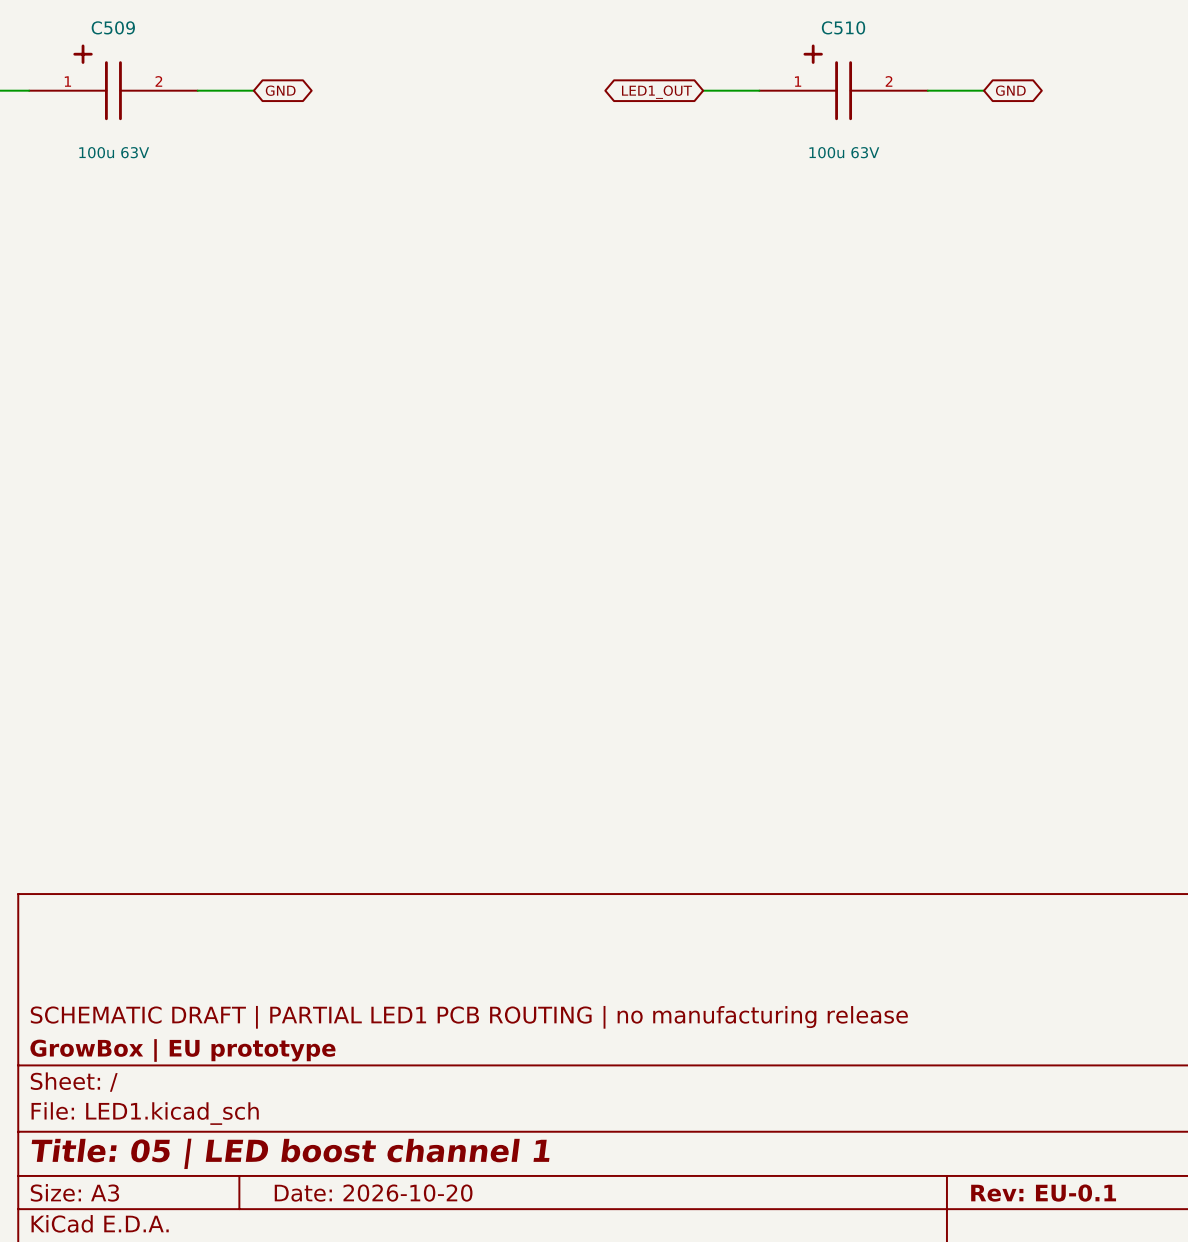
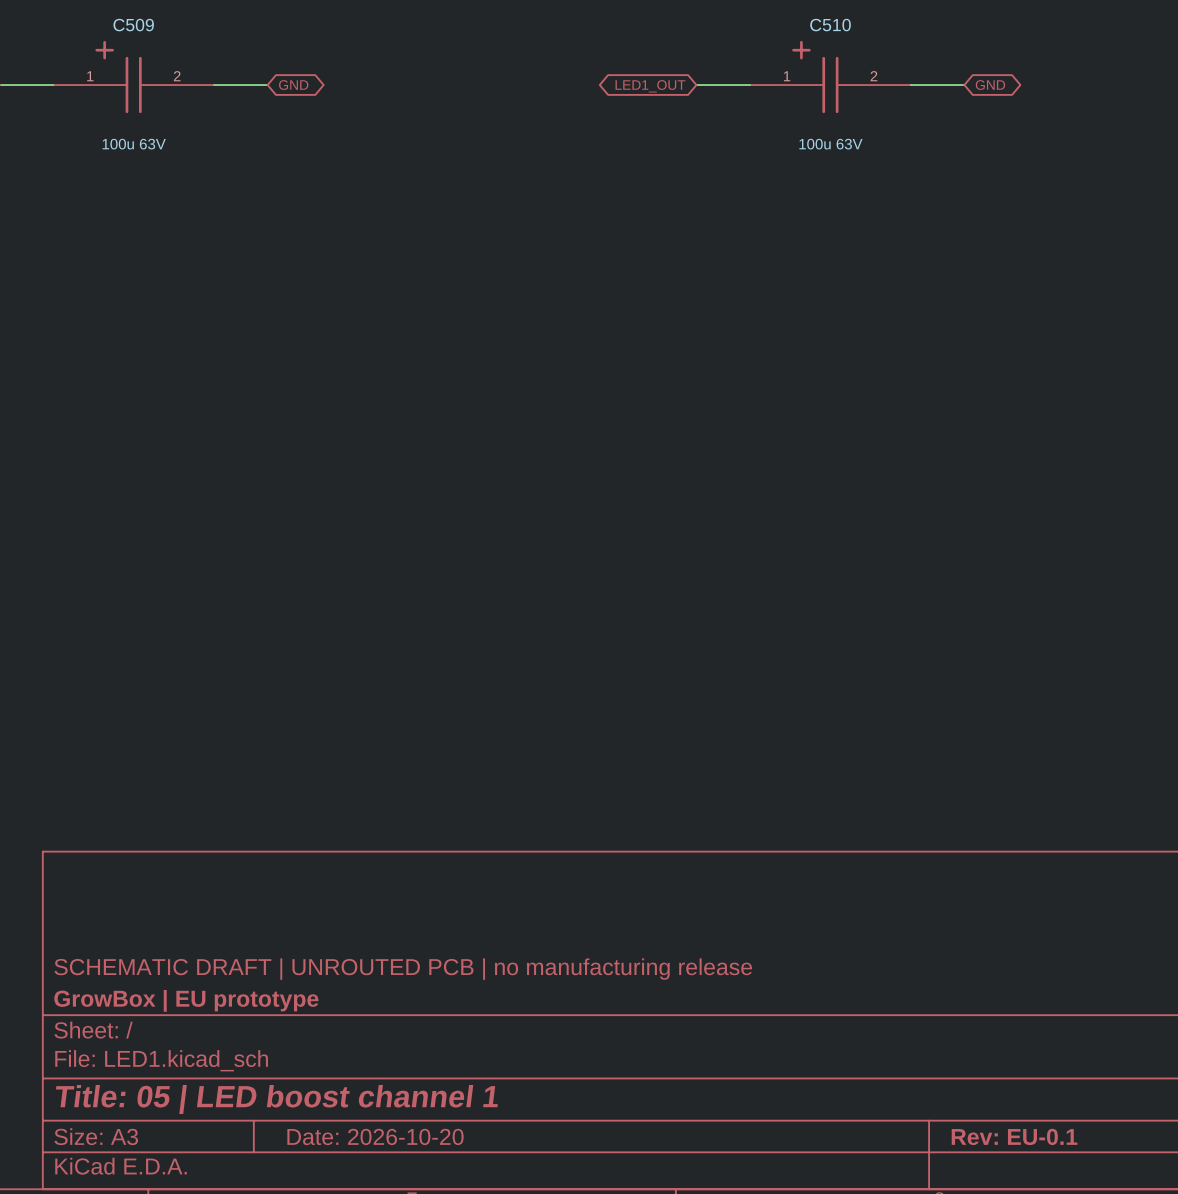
title block: SCHEMATIC DRAFT | PARTIAL LED1 PCB ROUTING | no manufacturing release (469, 1017) -> SCHEMATIC DRAFT | UNROUTED PCB | no manufacturing release (403, 969)

